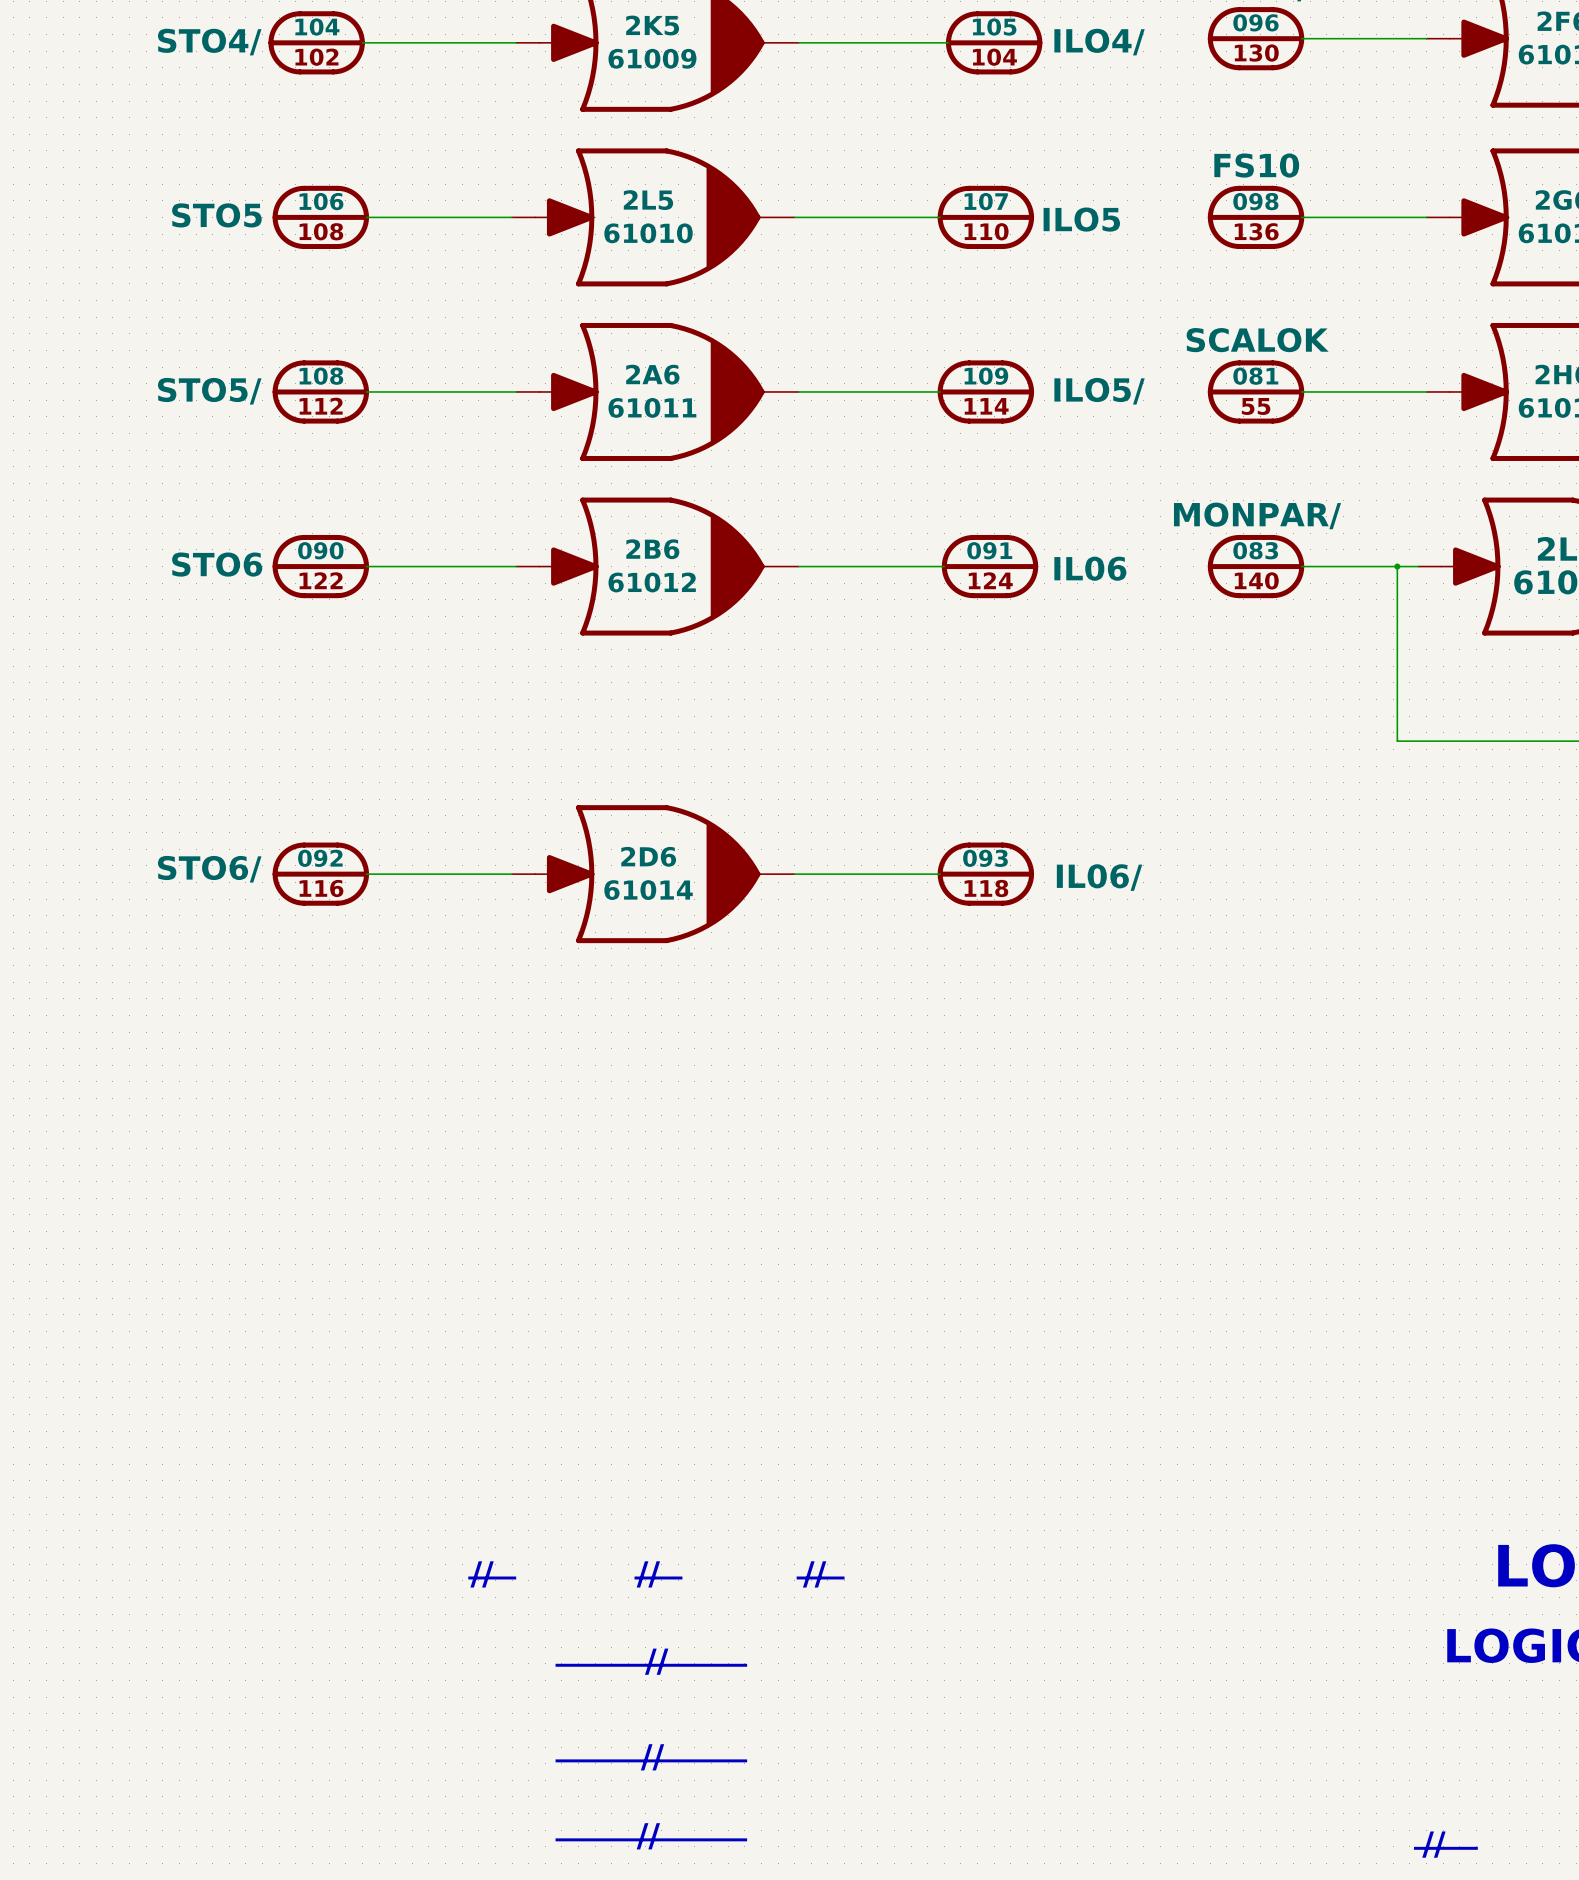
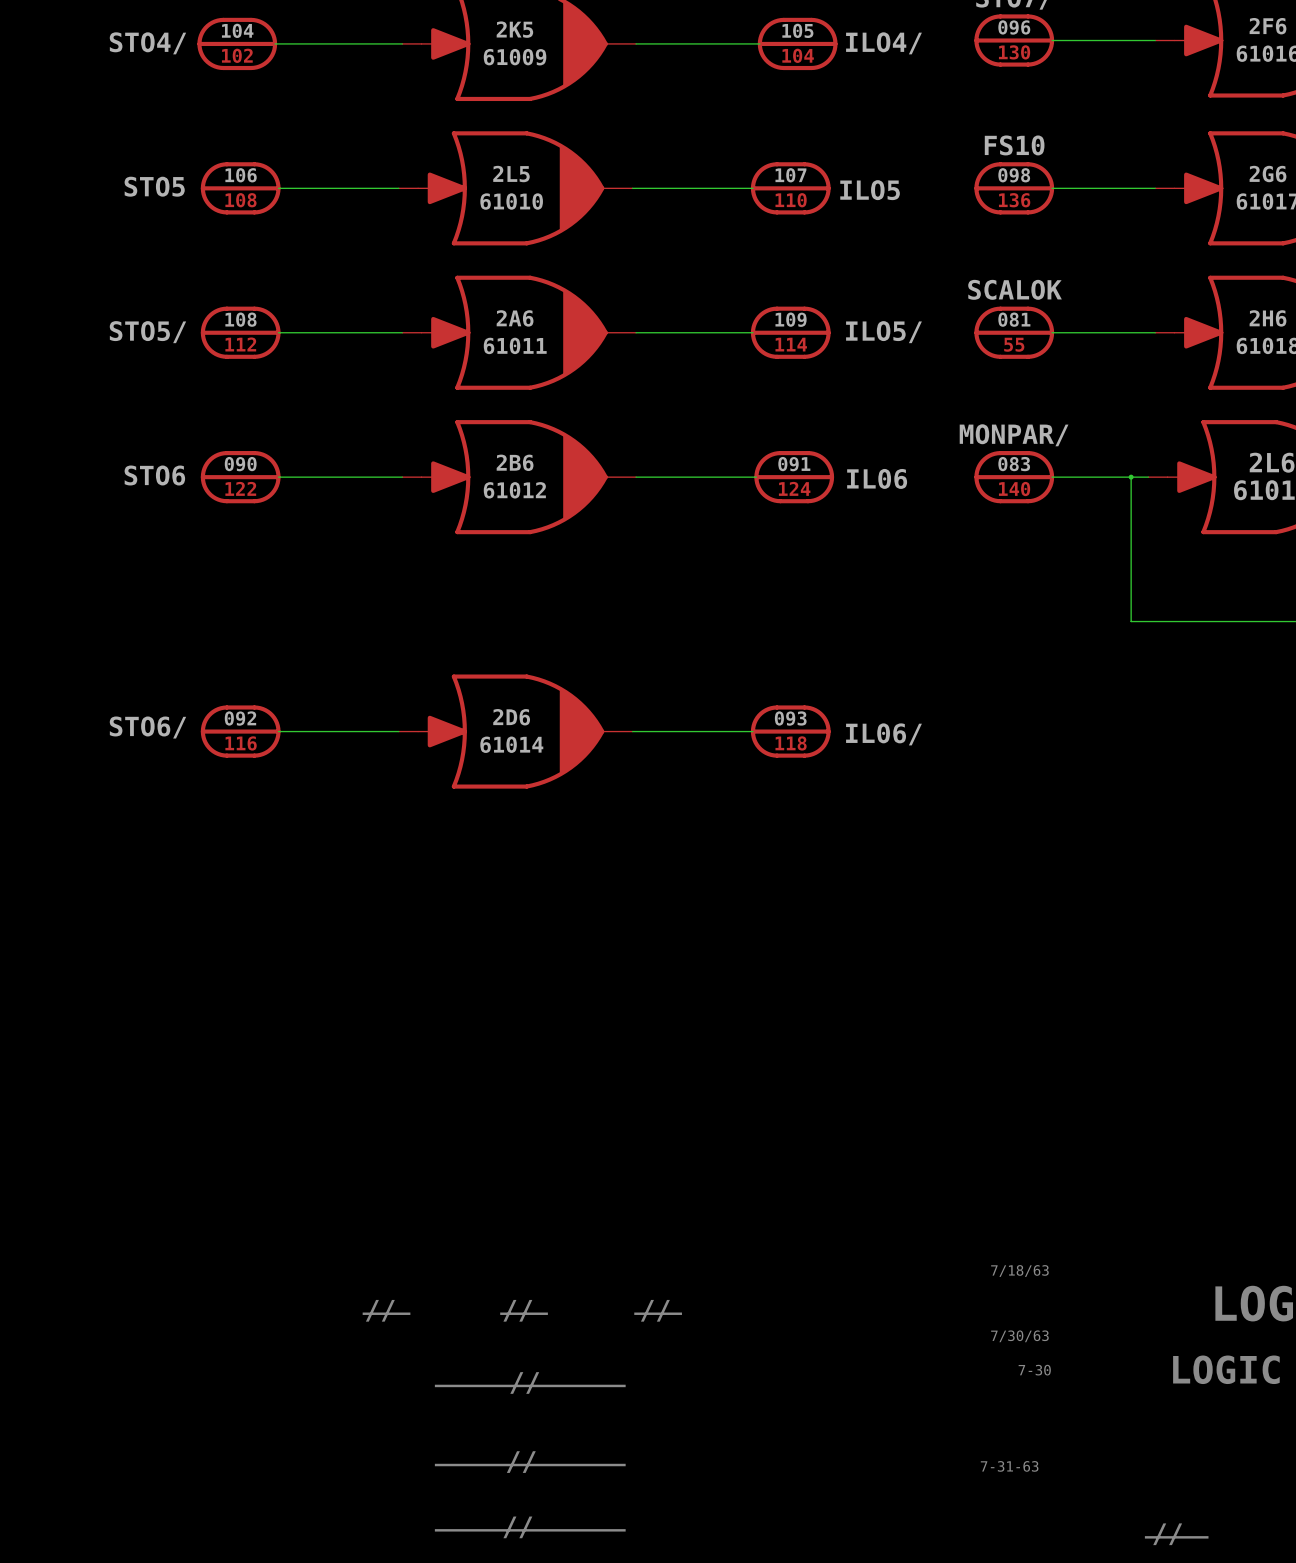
text: none -> 7/18/63 (1019, 1271)
text: none -> 7/30/63 (1019, 1336)
text: none -> 7-30 (1034, 1370)
text: none -> 7-31-63 (1009, 1466)

